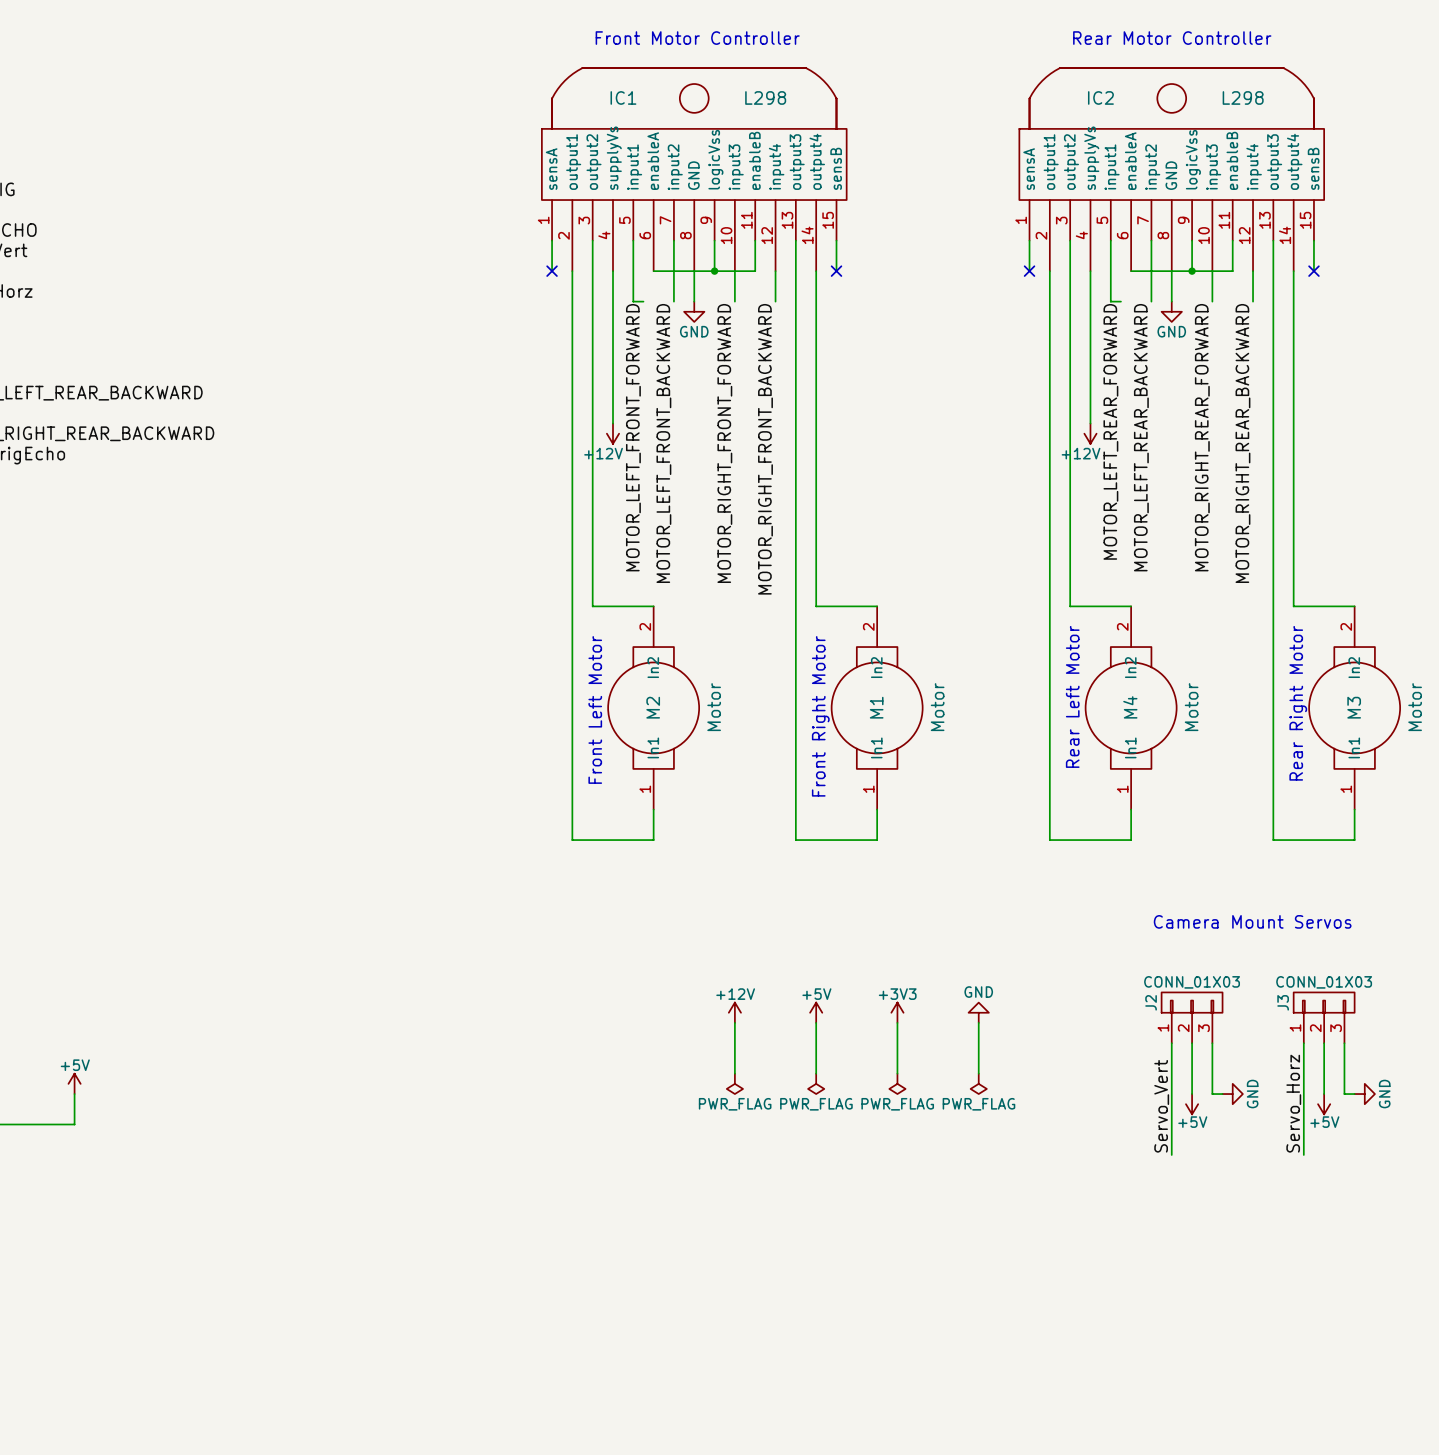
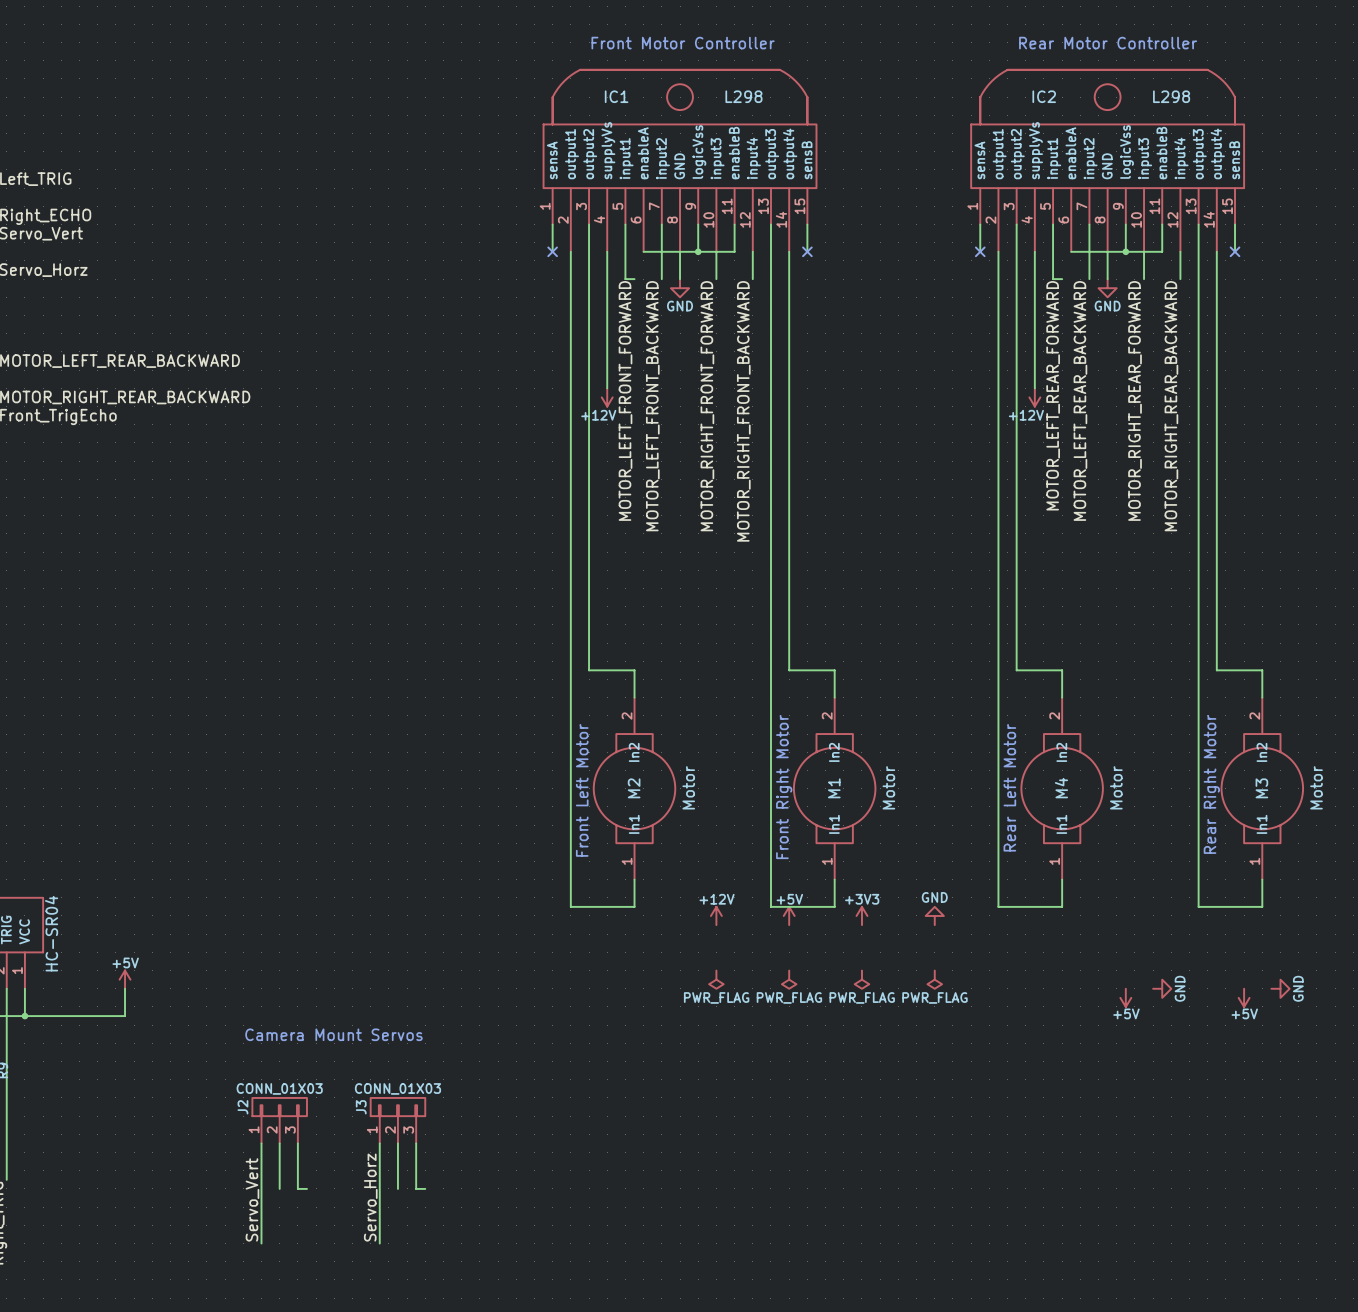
wire: (592, 606) (653, 606) -> (589, 552) (589, 670) (634, 670) (634, 697)
wire: (816, 606) (877, 606) -> (789, 552) (789, 670) (834, 670) (834, 697)
wire: (1070, 606) (1131, 606) -> (1016, 552) (1016, 670) (1062, 670) (1062, 697)
wire: (1293, 606) (1354, 606) -> (1216, 552) (1216, 670) (1262, 670) (1262, 697)
text position: Rear Left Motor (1072, 696) -> Rear Left Motor (1009, 787)
text position: Rear Right Motor (1298, 703) -> Rear Right Motor (1211, 784)
text position: Front Left Motor (595, 709) -> Front Left Motor (582, 790)
text position: Front Right Motor (820, 716) -> Front Right Motor (784, 787)
wire: (653, 809) (653, 840) (572, 840) -> (634, 879) (634, 906) (570, 906) (570, 761)
wire: (877, 809) (877, 840) (795, 840) -> (834, 879) (834, 906) (770, 906) (770, 761)
wire: (1131, 809) (1131, 840) (1049, 840) -> (1062, 879) (1062, 906) (998, 906) (998, 761)
wire: (1354, 809) (1354, 840) (1273, 840) -> (1262, 879) (1262, 906) (1198, 906) (1198, 761)
M2 position: (661, 895) -> (641, 956)
M1 position: (884, 895) -> (841, 956)
M4 position: (1138, 895) -> (1069, 956)
M3 position: (1362, 895) -> (1269, 956)
text: Camera Mount Servos (1252, 921) -> none
J2 position: (1192, 1017) -> (279, 1120)
J3 position: (1324, 1017) -> (397, 1120)
wire: (734, 1022) (734, 1073) -> none
wire: (816, 1022) (816, 1073) -> none
wire: (897, 1022) (897, 1073) -> none
wire: (978, 1022) (978, 1073) -> none
wire: (1171, 1043) (1171, 1154) -> none
wire: (1192, 1043) (1192, 1094) -> none
wire: (1212, 1043) (1212, 1094) (1222, 1094) -> none
wire: (1303, 1043) (1303, 1154) -> none
wire: (1324, 1043) (1324, 1094) -> none
wire: (1344, 1043) (1344, 1094) (1354, 1094) -> none
label: Servo_Horz (1293, 1103) -> none
label: Servo_Vert (1161, 1106) -> none
text: none -> Camera Mount Servos (333, 1034)
wire: none -> (261, 1143) (261, 1243)
wire: none -> (279, 1143) (279, 1188)
wire: none -> (297, 1143) (297, 1188) (306, 1188)
wire: none -> (379, 1143) (379, 1243)
wire: none -> (397, 1143) (397, 1188)
wire: none -> (416, 1143) (416, 1188) (425, 1188)
label: none -> Servo_Horz (370, 1197)
label: none -> Servo_Vert (252, 1199)

